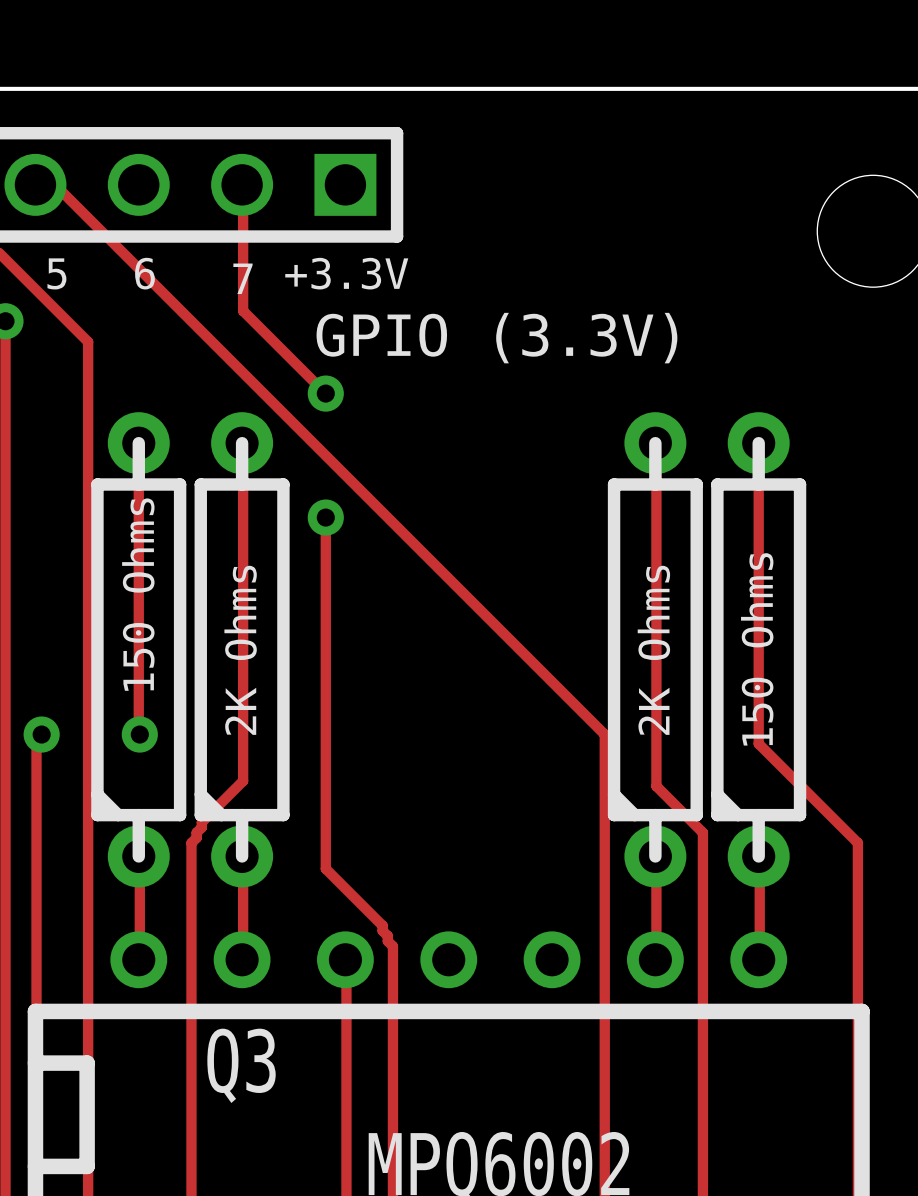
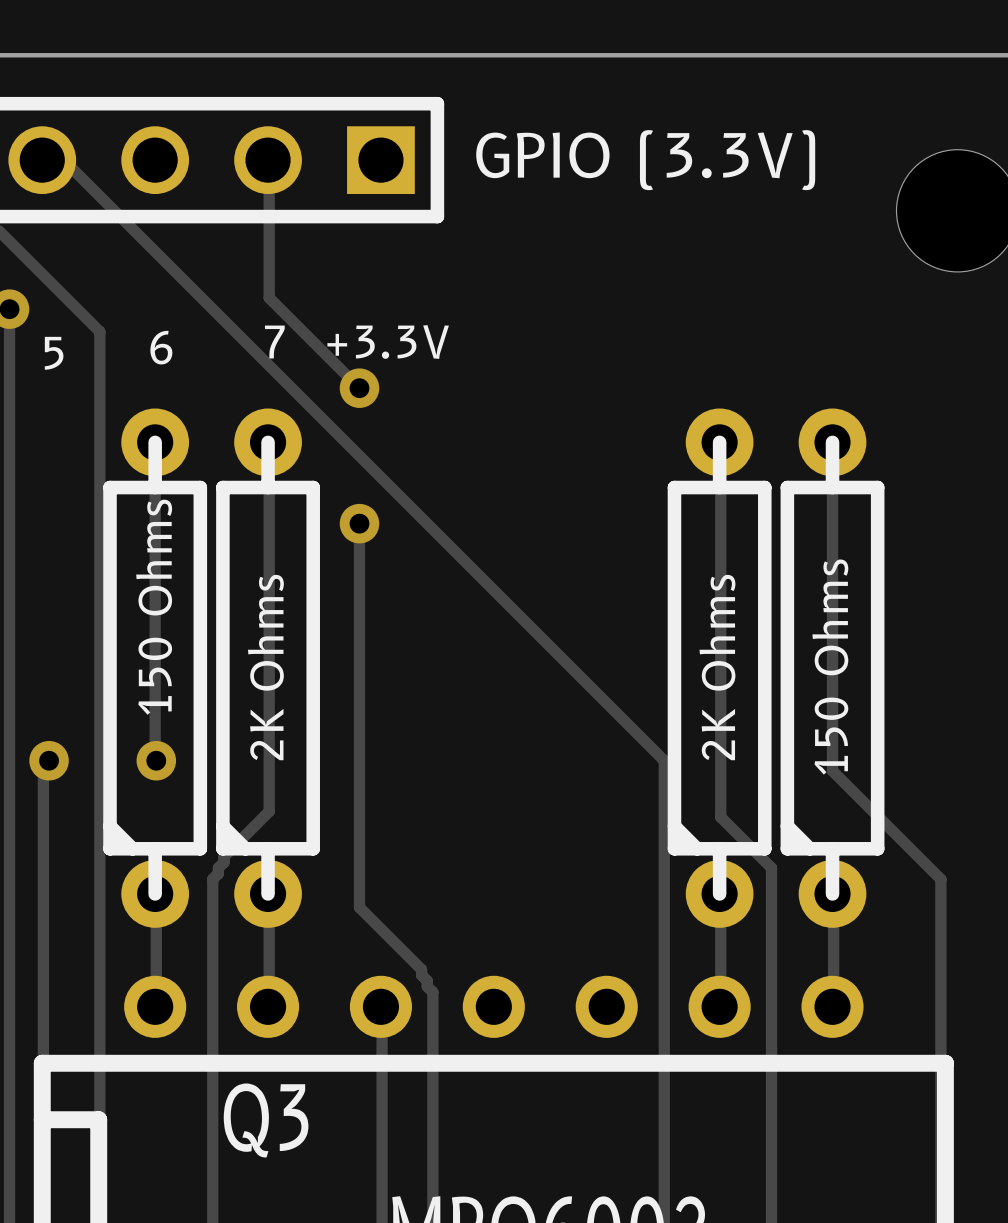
text position: 5 (56, 273) -> 5 (54, 353)
text position: 6 (144, 273) -> 6 (161, 347)
text position: +3.3V (346, 273) -> +3.3V (388, 342)
text position: 7 (242, 278) -> 7 (274, 342)
part value position: GPIO (3.3V) (496, 338) -> GPIO (3.3V) (645, 160)

